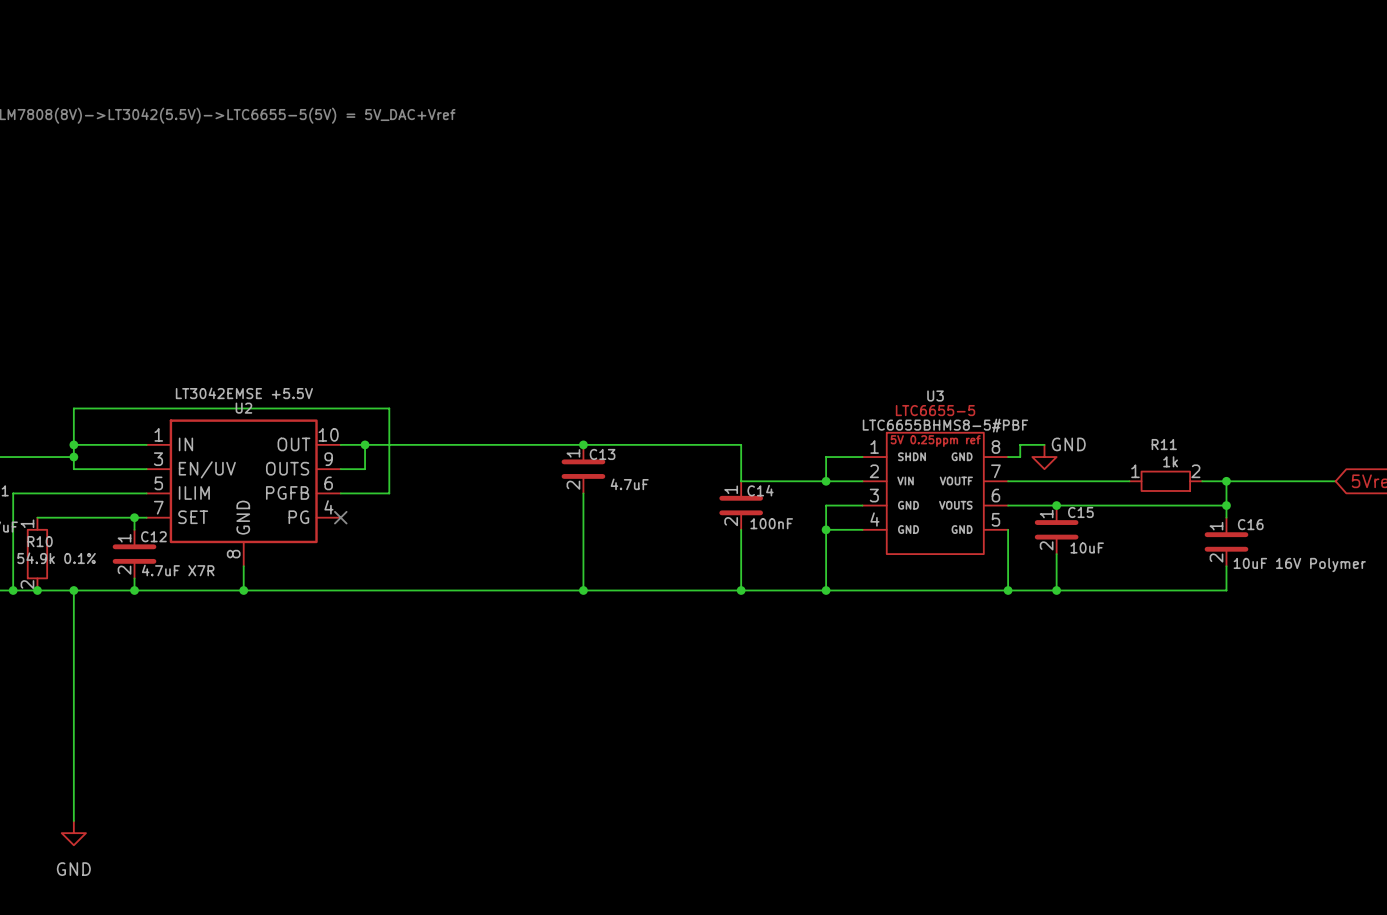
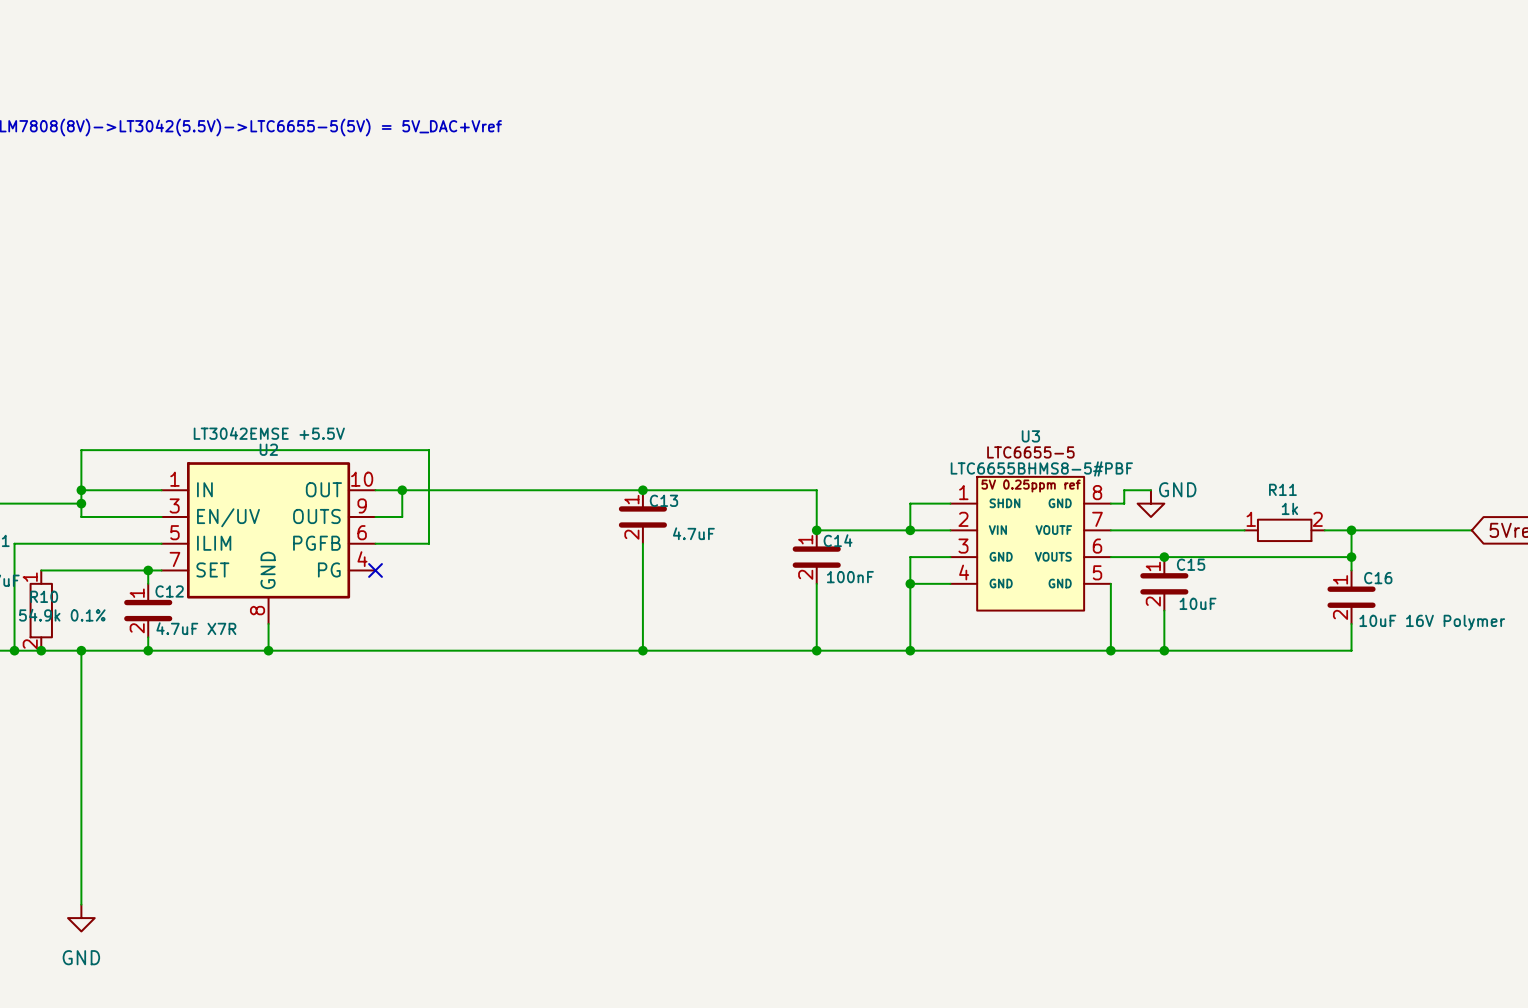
junction: none -> (816, 530)

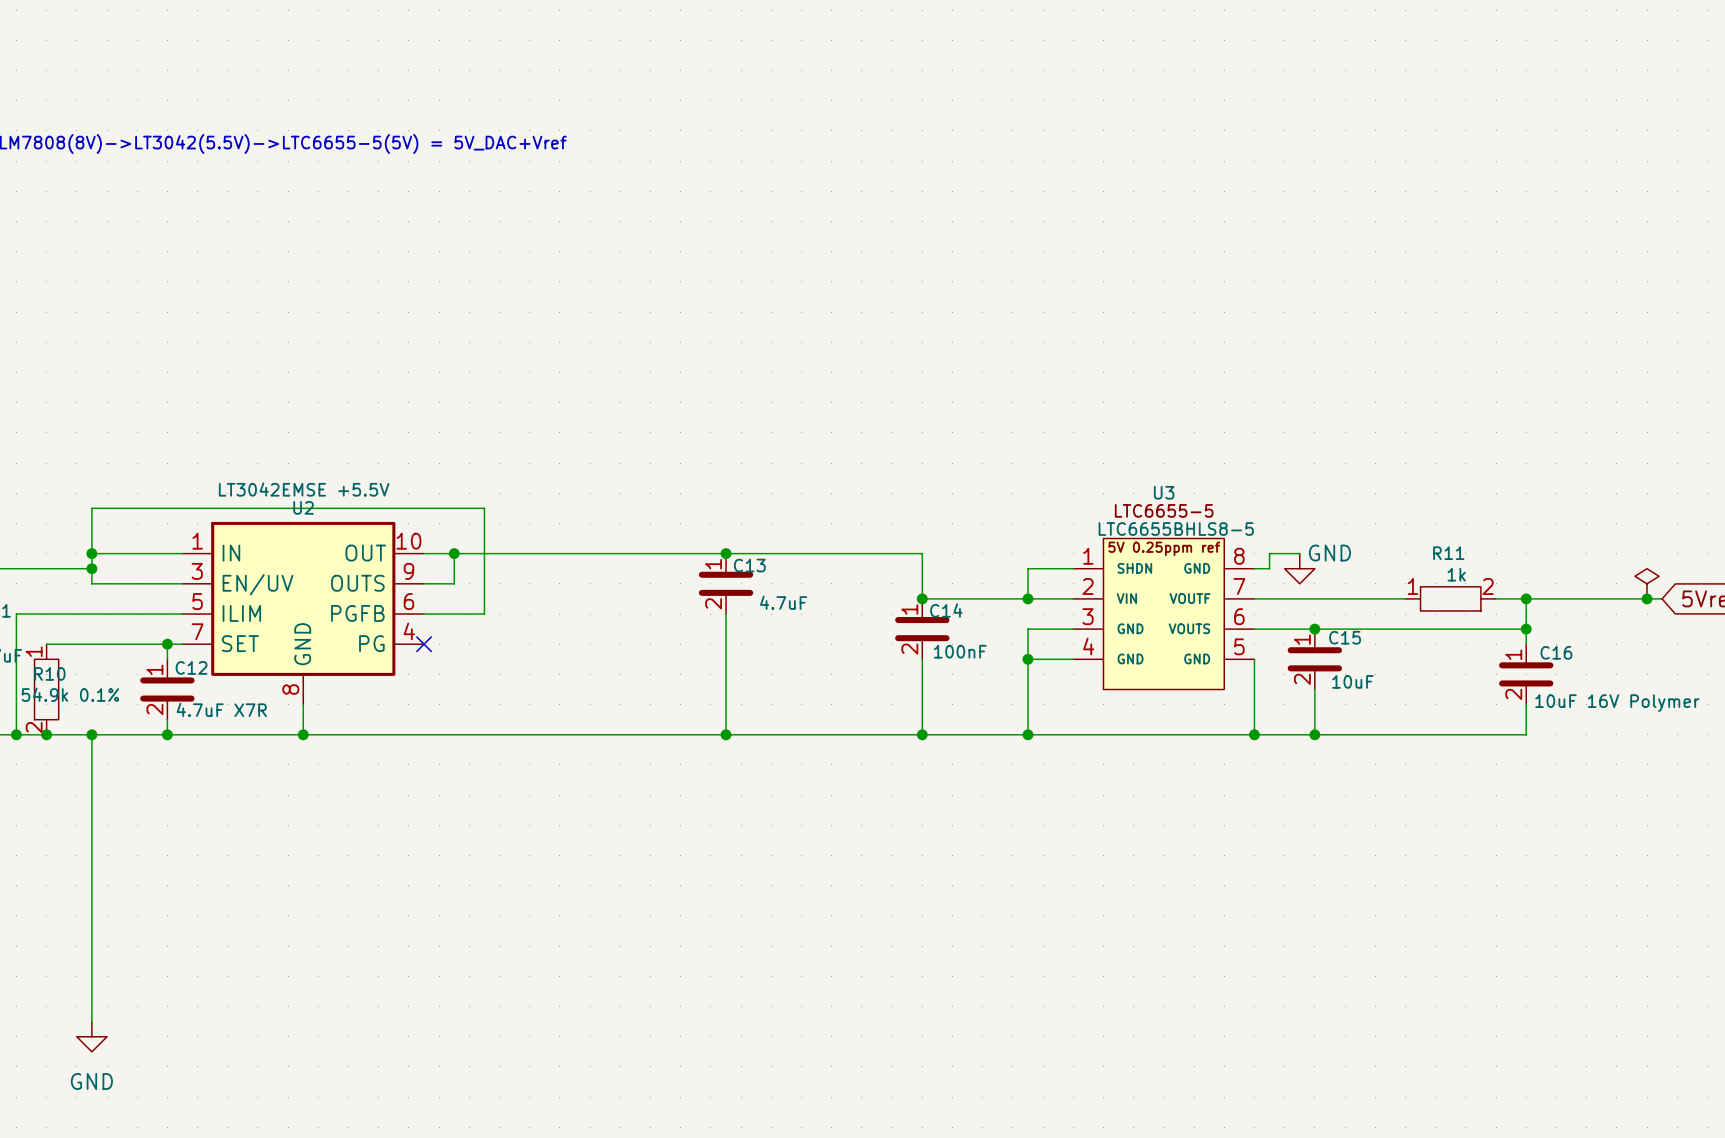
U3 value: LTC6655BHMS8-5#PBF (1041, 468) -> LTC6655BHLS8-5 (1176, 529)
power symbol: none -> (1647, 583)
junction: none -> (1647, 598)

